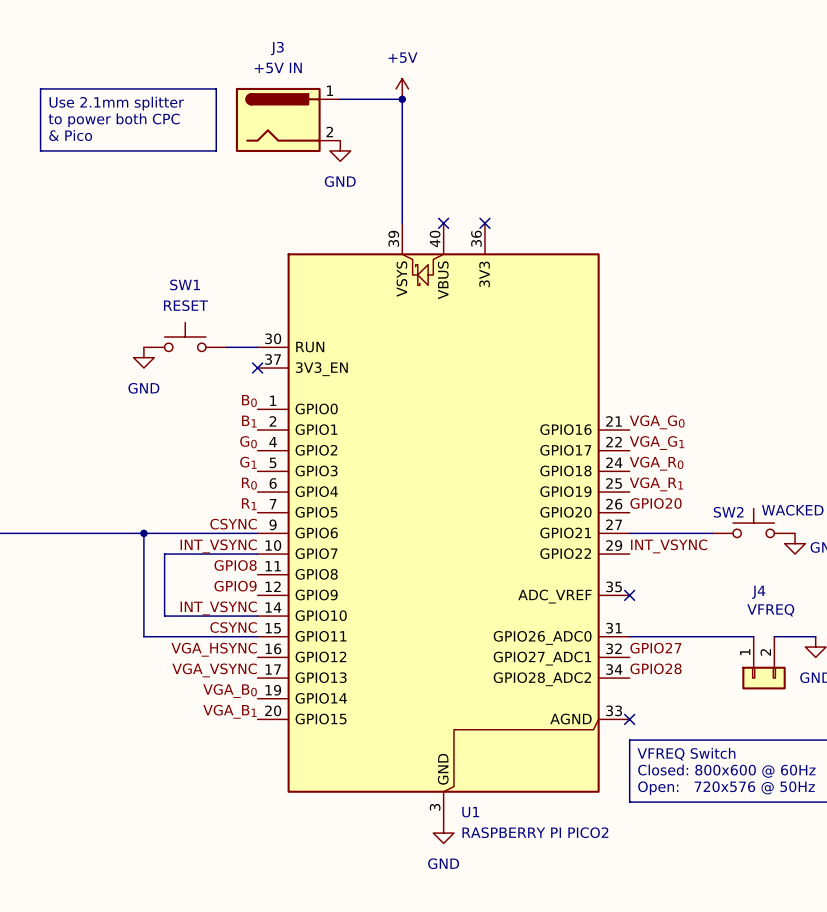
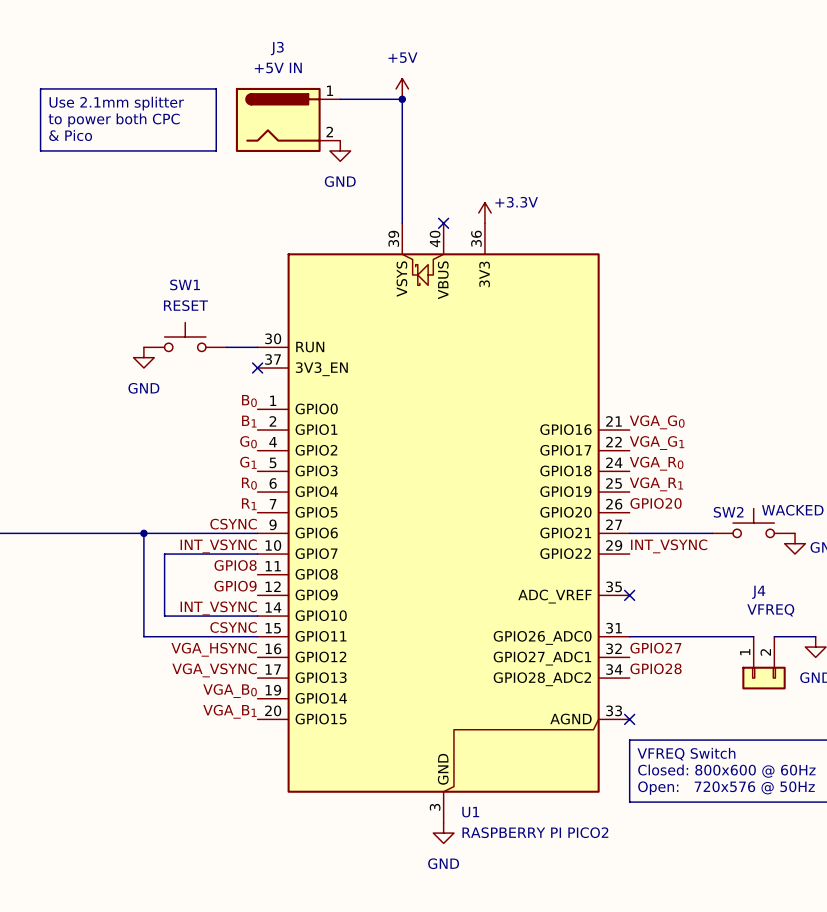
power symbol: none -> +3.3V (484, 212)
no-connect mark: (484, 223) -> none

